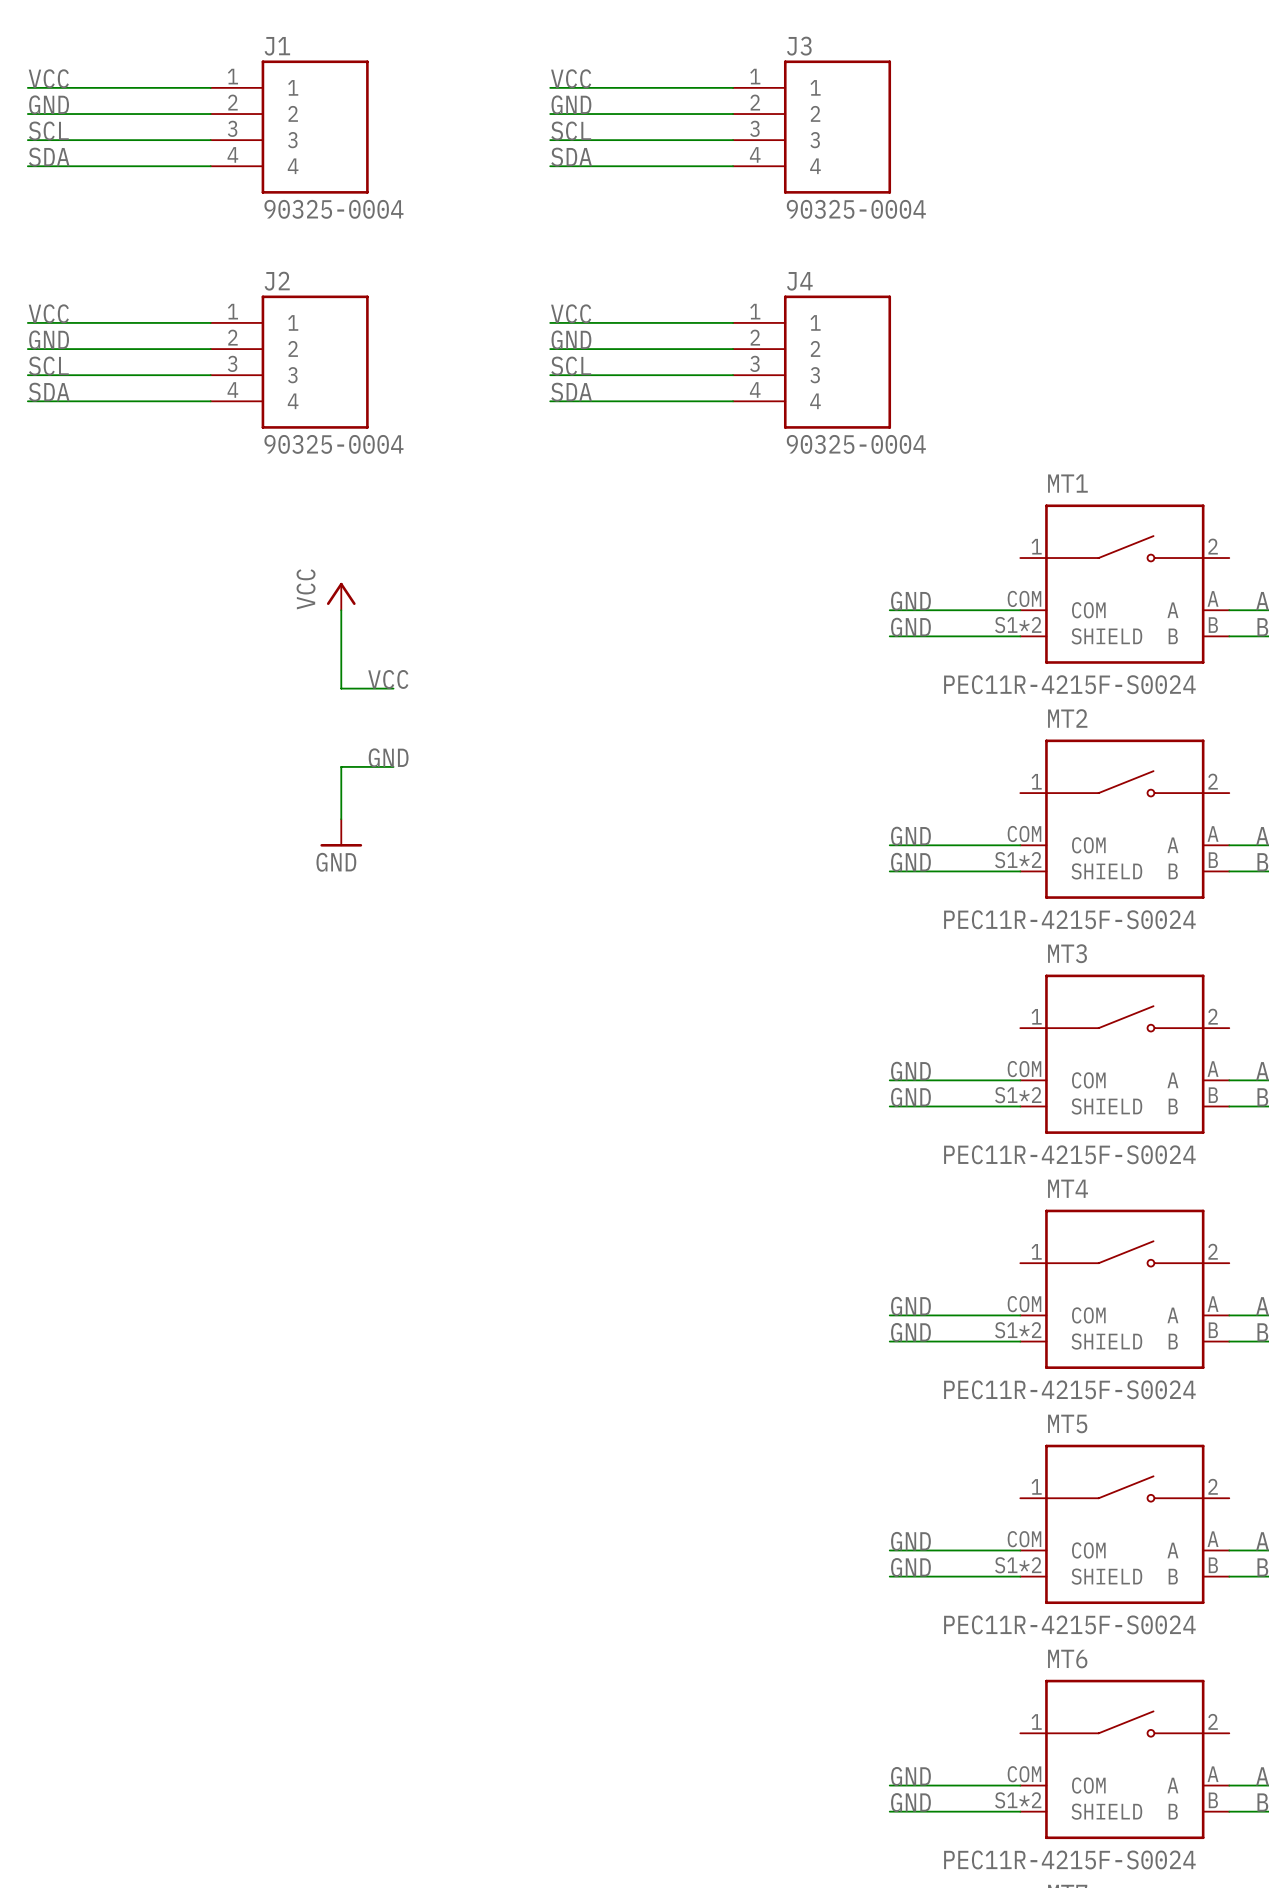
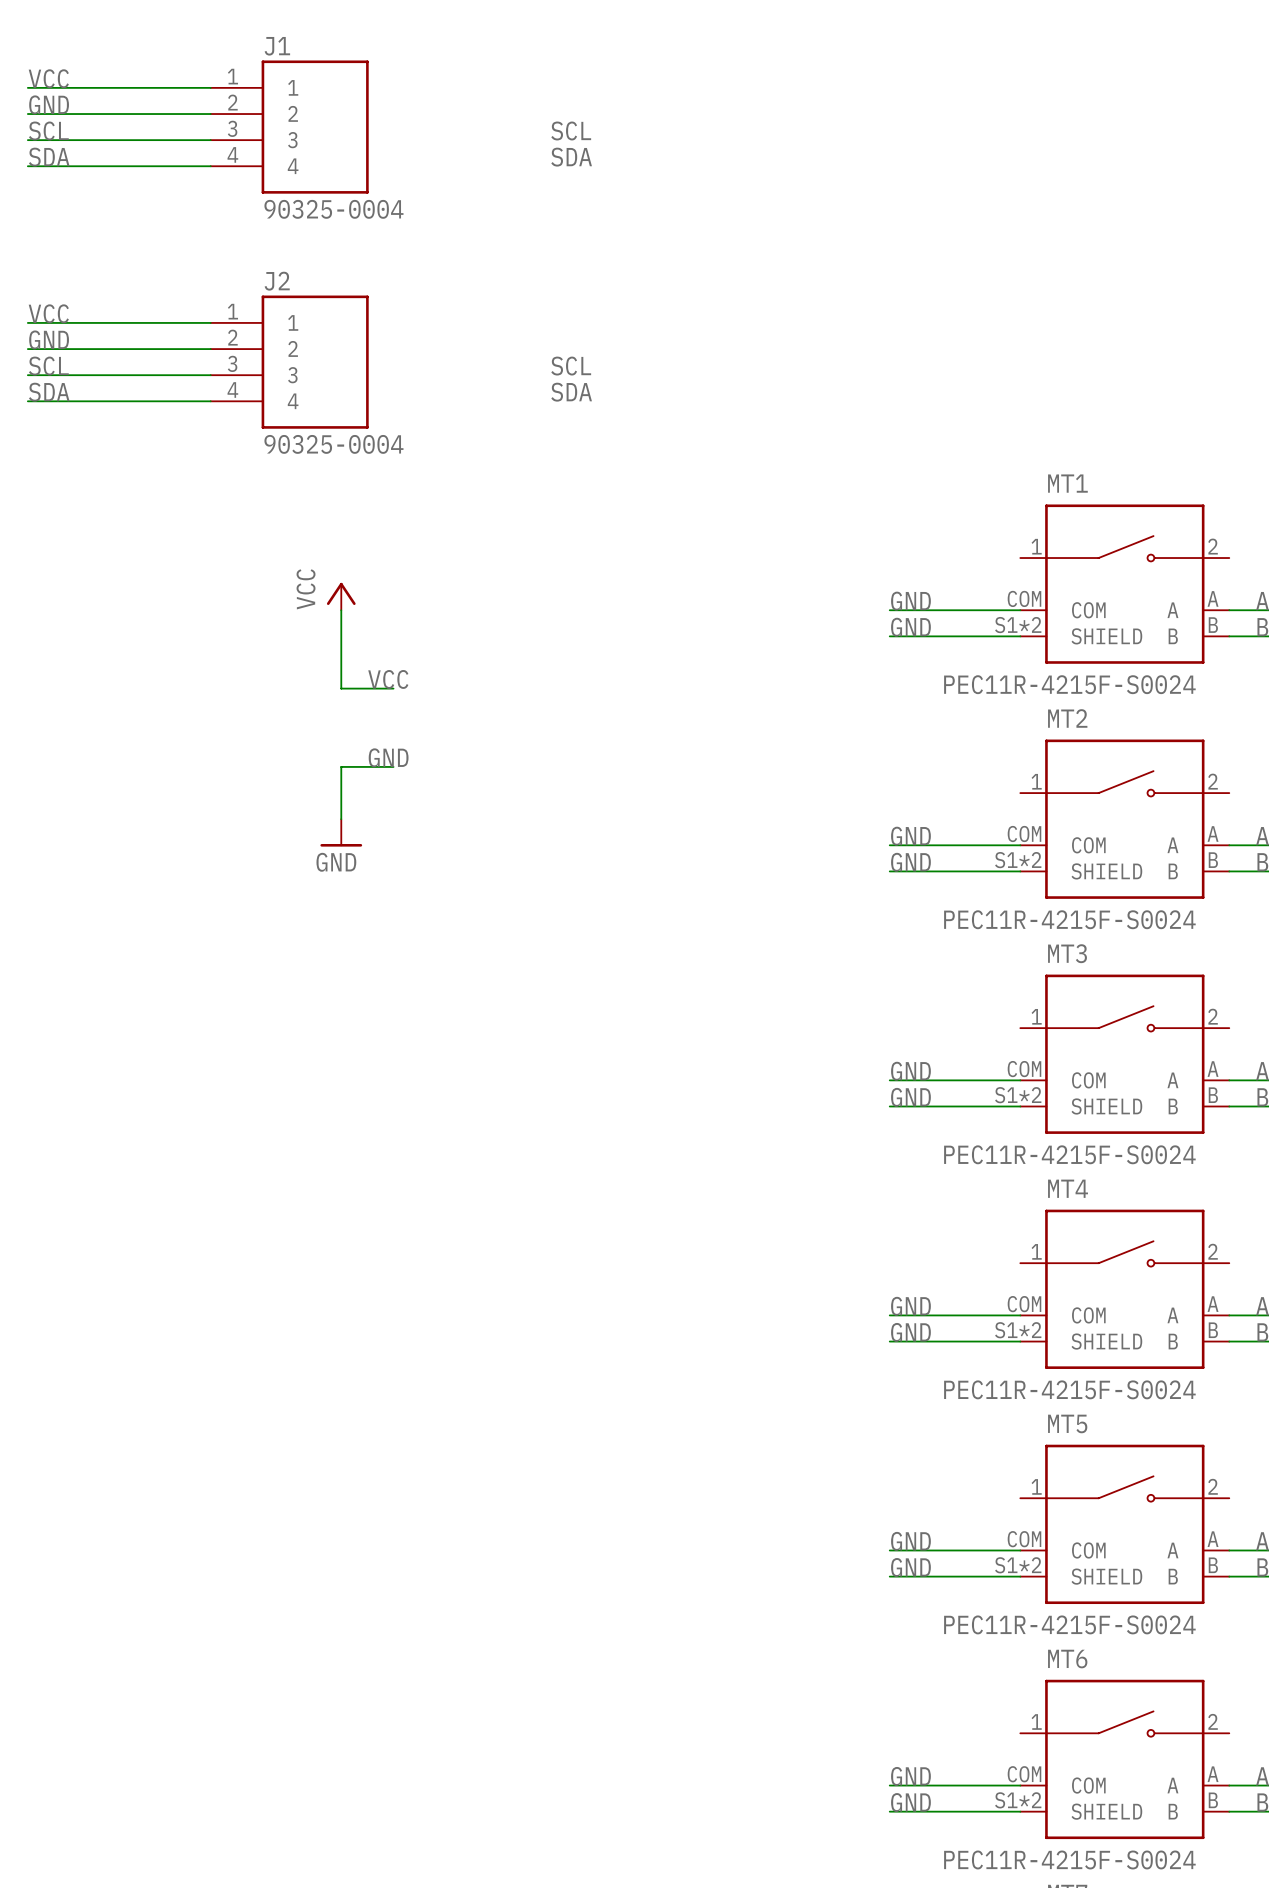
label: VCC (571, 78) -> none
wire: (550, 87) (733, 87) -> none
label: GND (571, 104) -> none
wire: (550, 114) (733, 114) -> none
J3: 90325-0004 (812, 127) -> none
wire: (550, 140) (733, 140) -> none
wire: (550, 166) (733, 166) -> none
label: VCC (571, 313) -> none
wire: (550, 322) (733, 322) -> none
label: GND (571, 339) -> none
wire: (550, 349) (733, 349) -> none
J4: 90325-0004 (812, 362) -> none
wire: (550, 375) (733, 375) -> none
wire: (550, 401) (733, 401) -> none

